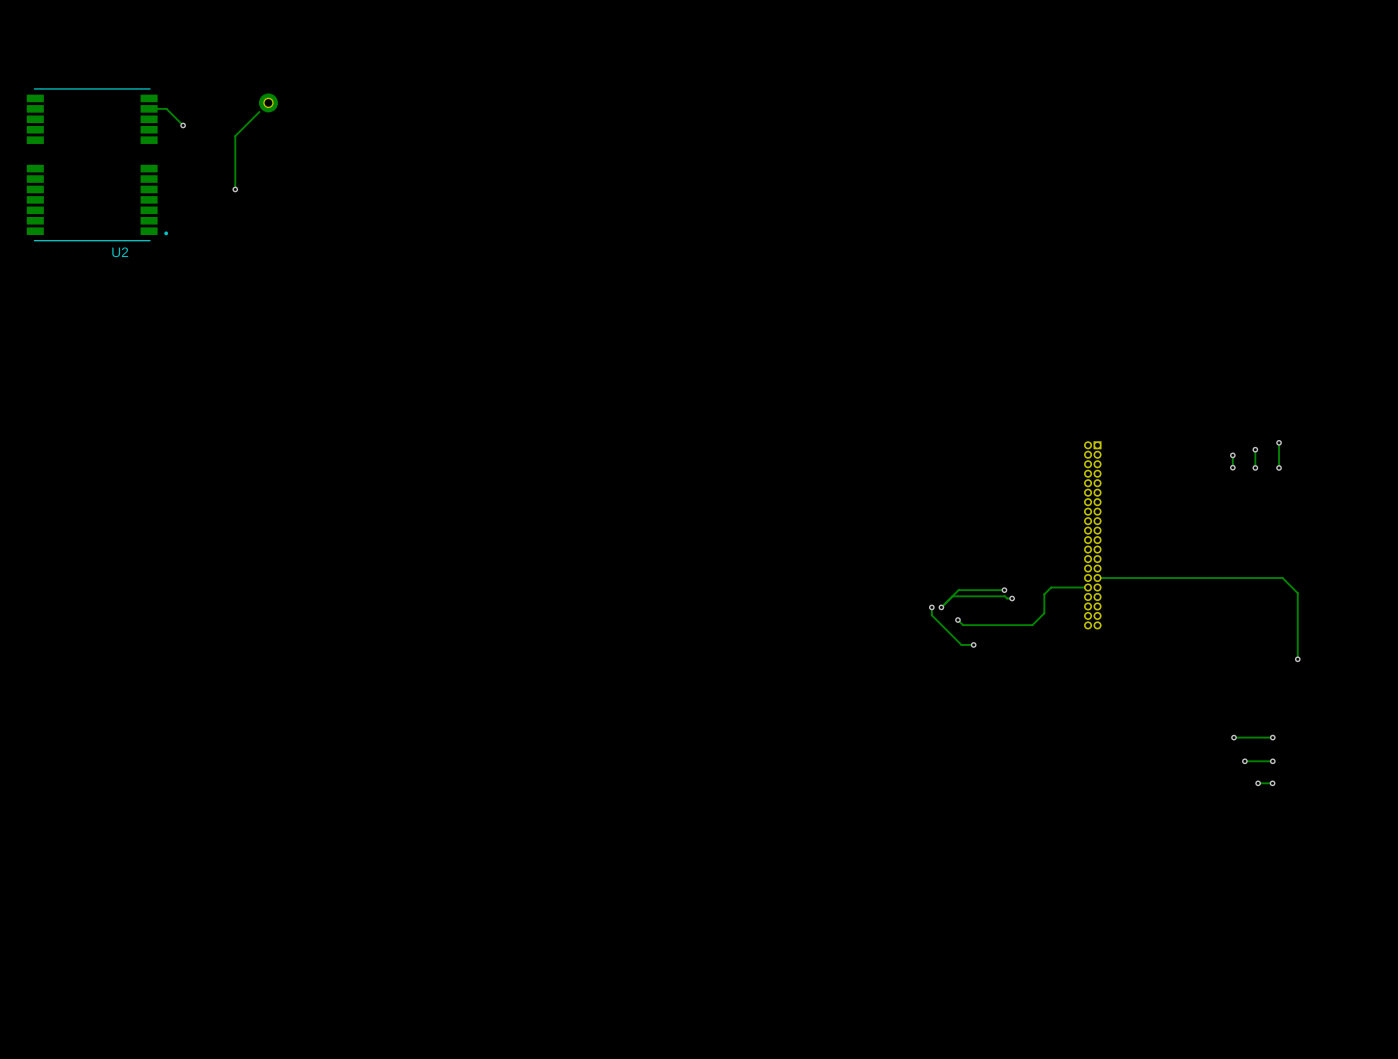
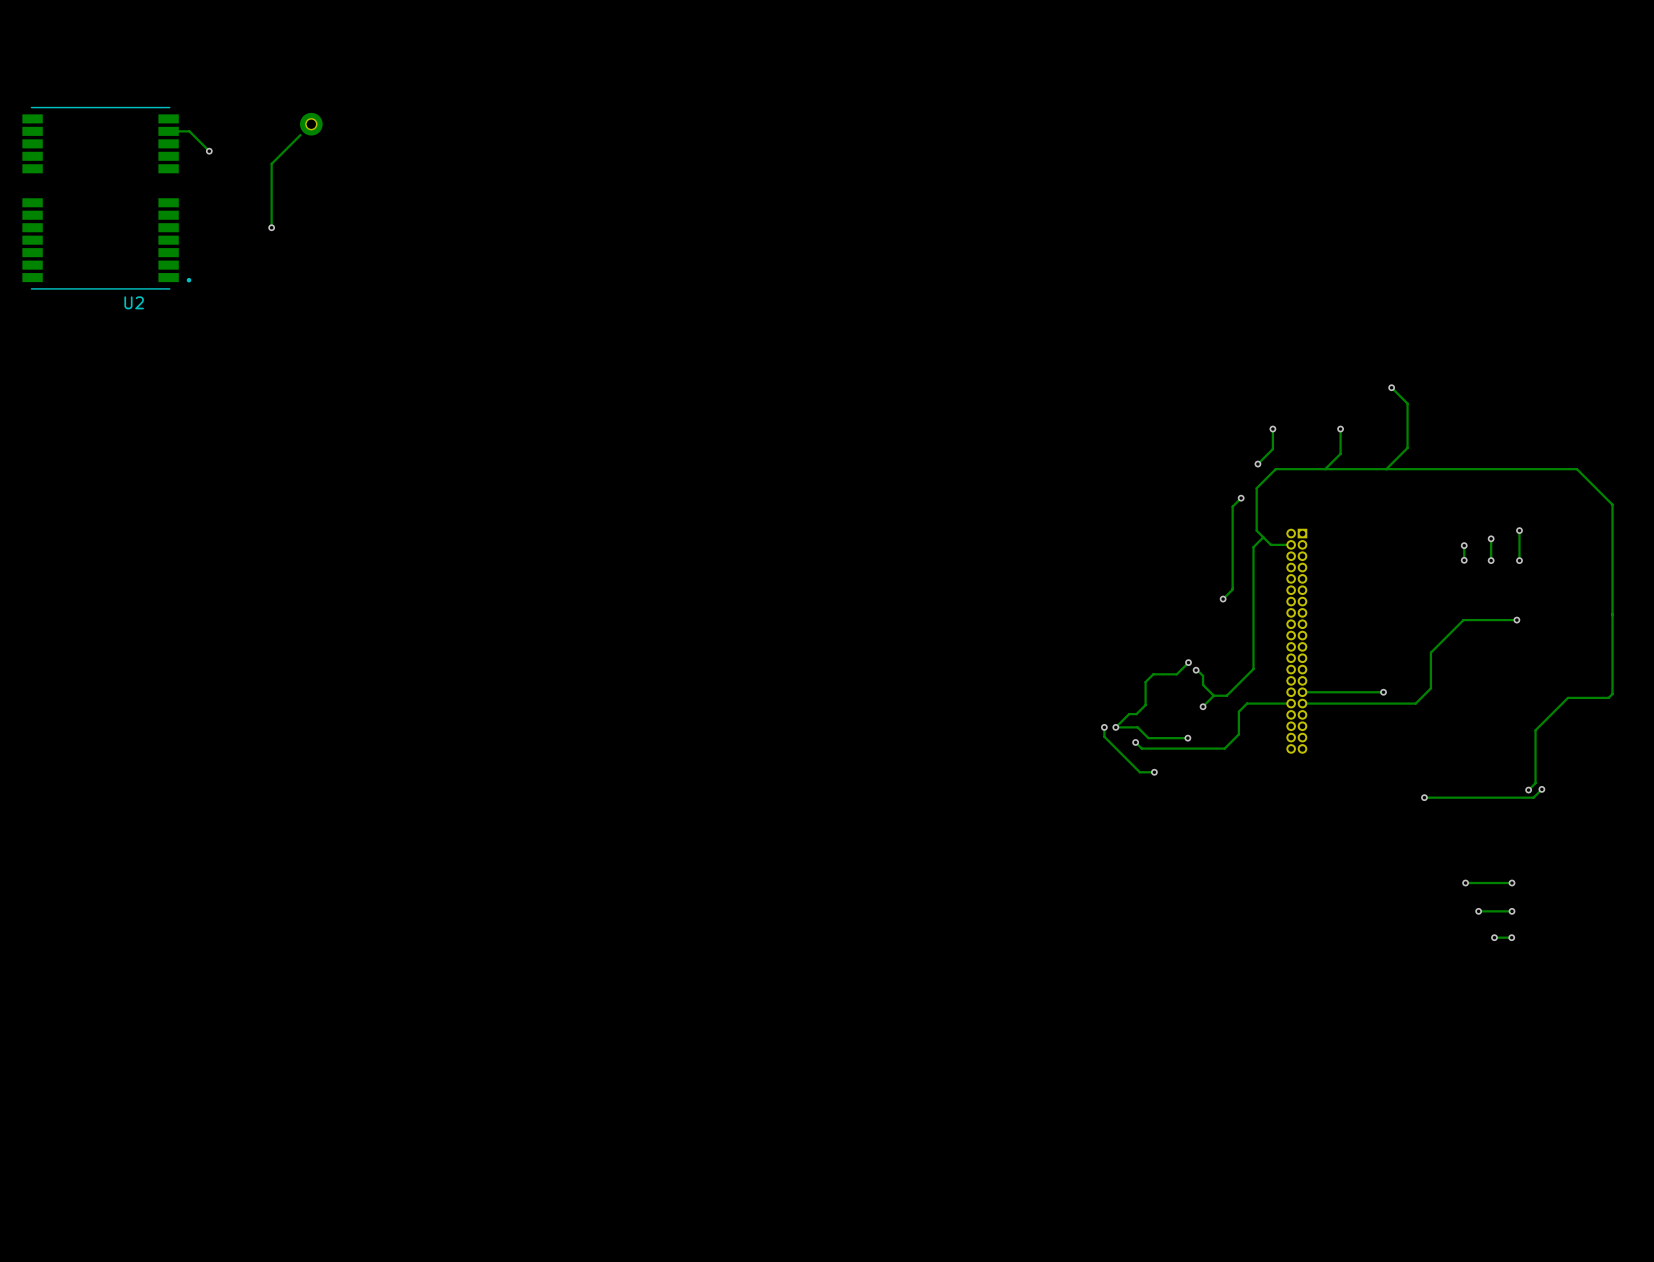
track: none -> (1391, 387) (1407, 403) (1407, 447) (1386, 469)
via: none -> (1391, 387)
track: none -> (1272, 429) (1272, 449) (1257, 464)
via: none -> (1272, 429)
track: none -> (1340, 429) (1340, 453) (1325, 469)
via: none -> (1340, 429)
via: none -> (1257, 464)
track: none -> (1241, 498) (1232, 506) (1232, 589) (1223, 599)
via: none -> (1241, 498)
track: none -> (1263, 537) (1253, 547) (1253, 669) (1226, 695) (1213, 695)
track: none -> (1291, 544) (1270, 544) (1256, 530) (1256, 488) (1275, 469) (1576, 469) (1612, 504) (1612, 694) (1608, 697) (1567, 697) (1535, 730) (1535, 783) (1528, 790)
via: none -> (1223, 599)
track: none -> (1516, 620) (1463, 620) (1430, 652) (1430, 688) (1415, 703) (1302, 703)
via: none -> (1516, 620)
via: none -> (1188, 662)
track: none -> (1196, 670) (1203, 675) (1203, 684) (1213, 695)
via: none -> (1196, 670)
track: (1165, 578) (1282, 578) (1297, 593) (1297, 659) -> (1424, 797) (1533, 797) (1541, 789)
via: none -> (1383, 692)
track: none -> (1213, 695) (1203, 706)
track: (1004, 590) (958, 590) (952, 596) -> none
via: (1004, 590) -> none
via: none -> (1203, 706)
track: (958, 596) (1004, 596) (1012, 598) -> (1136, 714) (1145, 705) (1145, 682) (1153, 674) (1176, 674) (1188, 662)
via: (1012, 598) -> none
track: none -> (1115, 727) (1137, 727) (1148, 738)
track: none -> (1187, 738) (1148, 738)
via: none -> (1187, 738)
via: none -> (1528, 790)
via: none -> (1424, 797)

